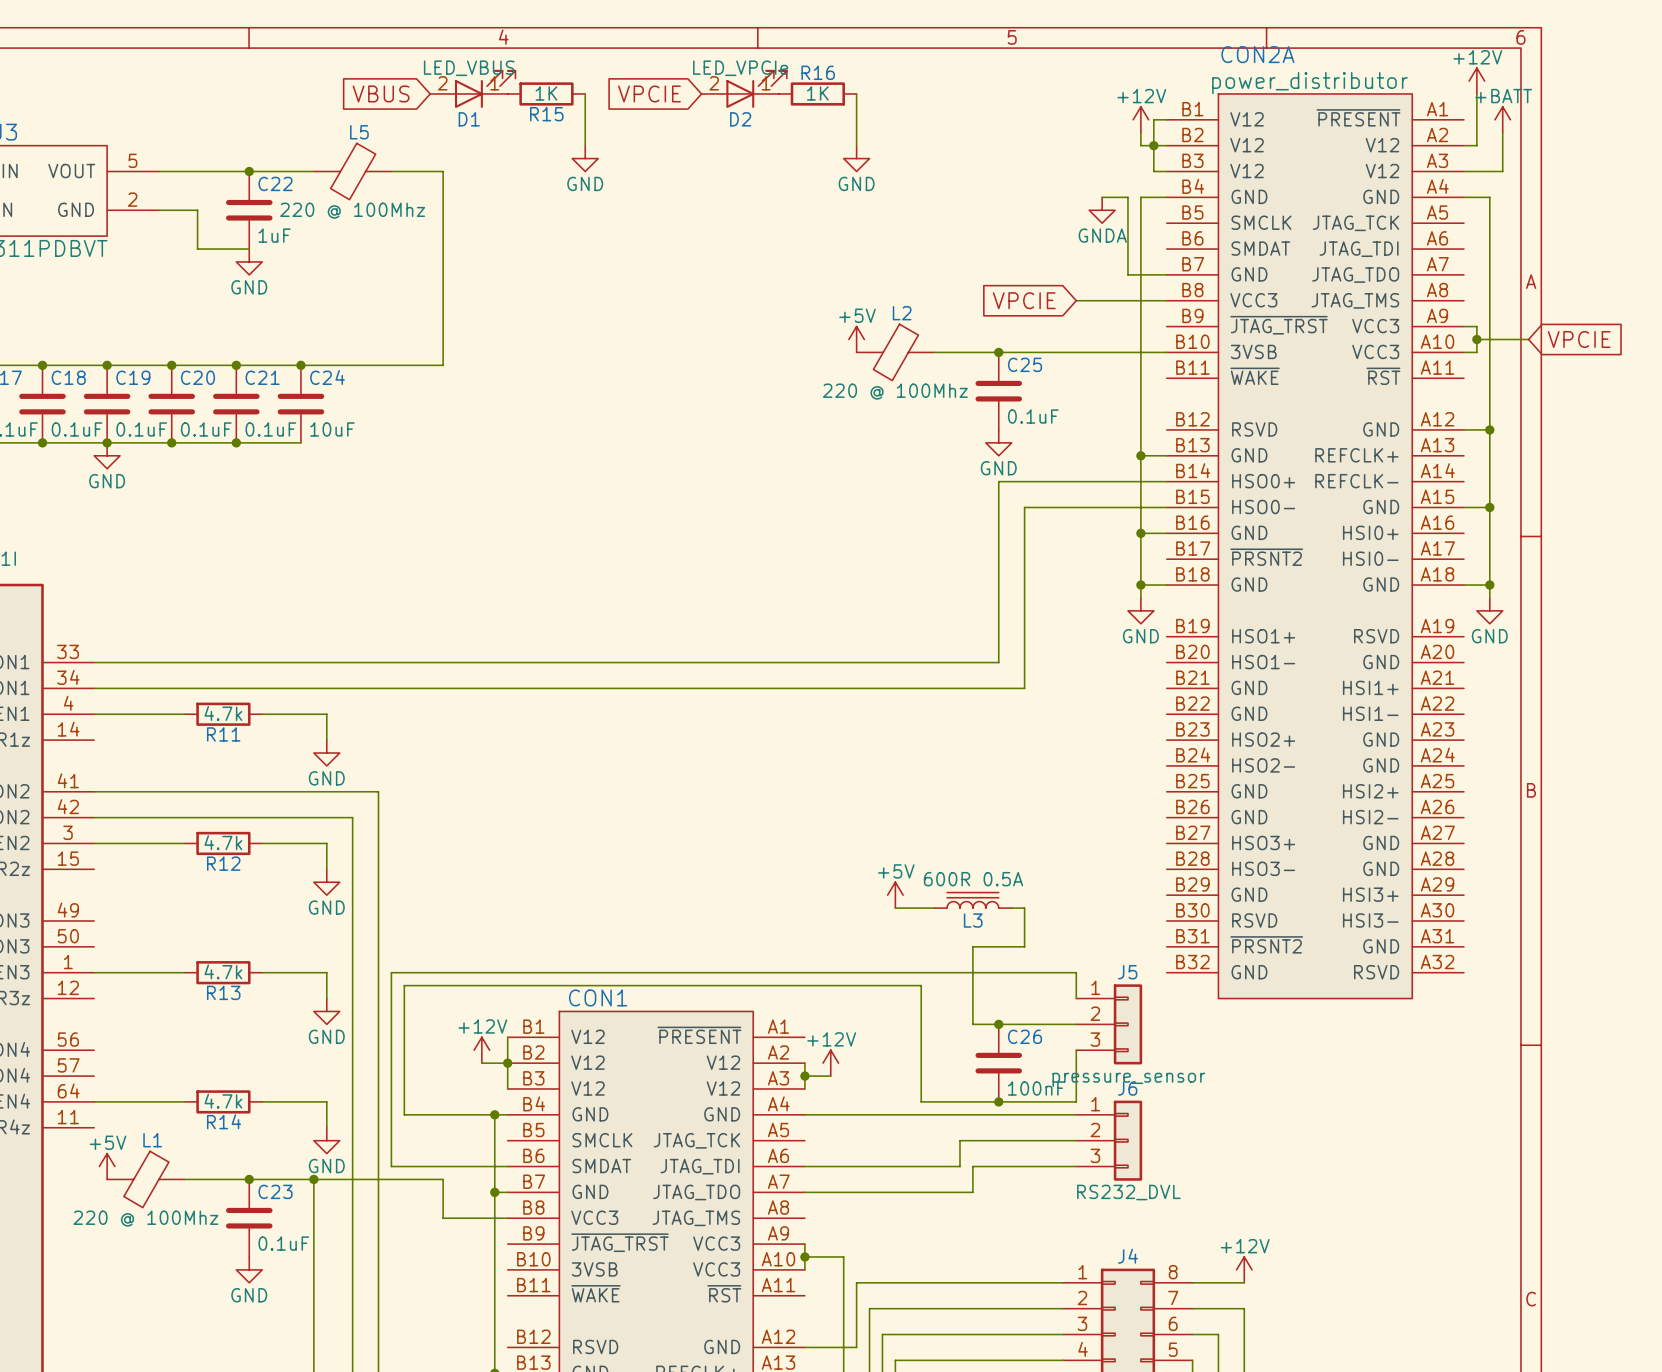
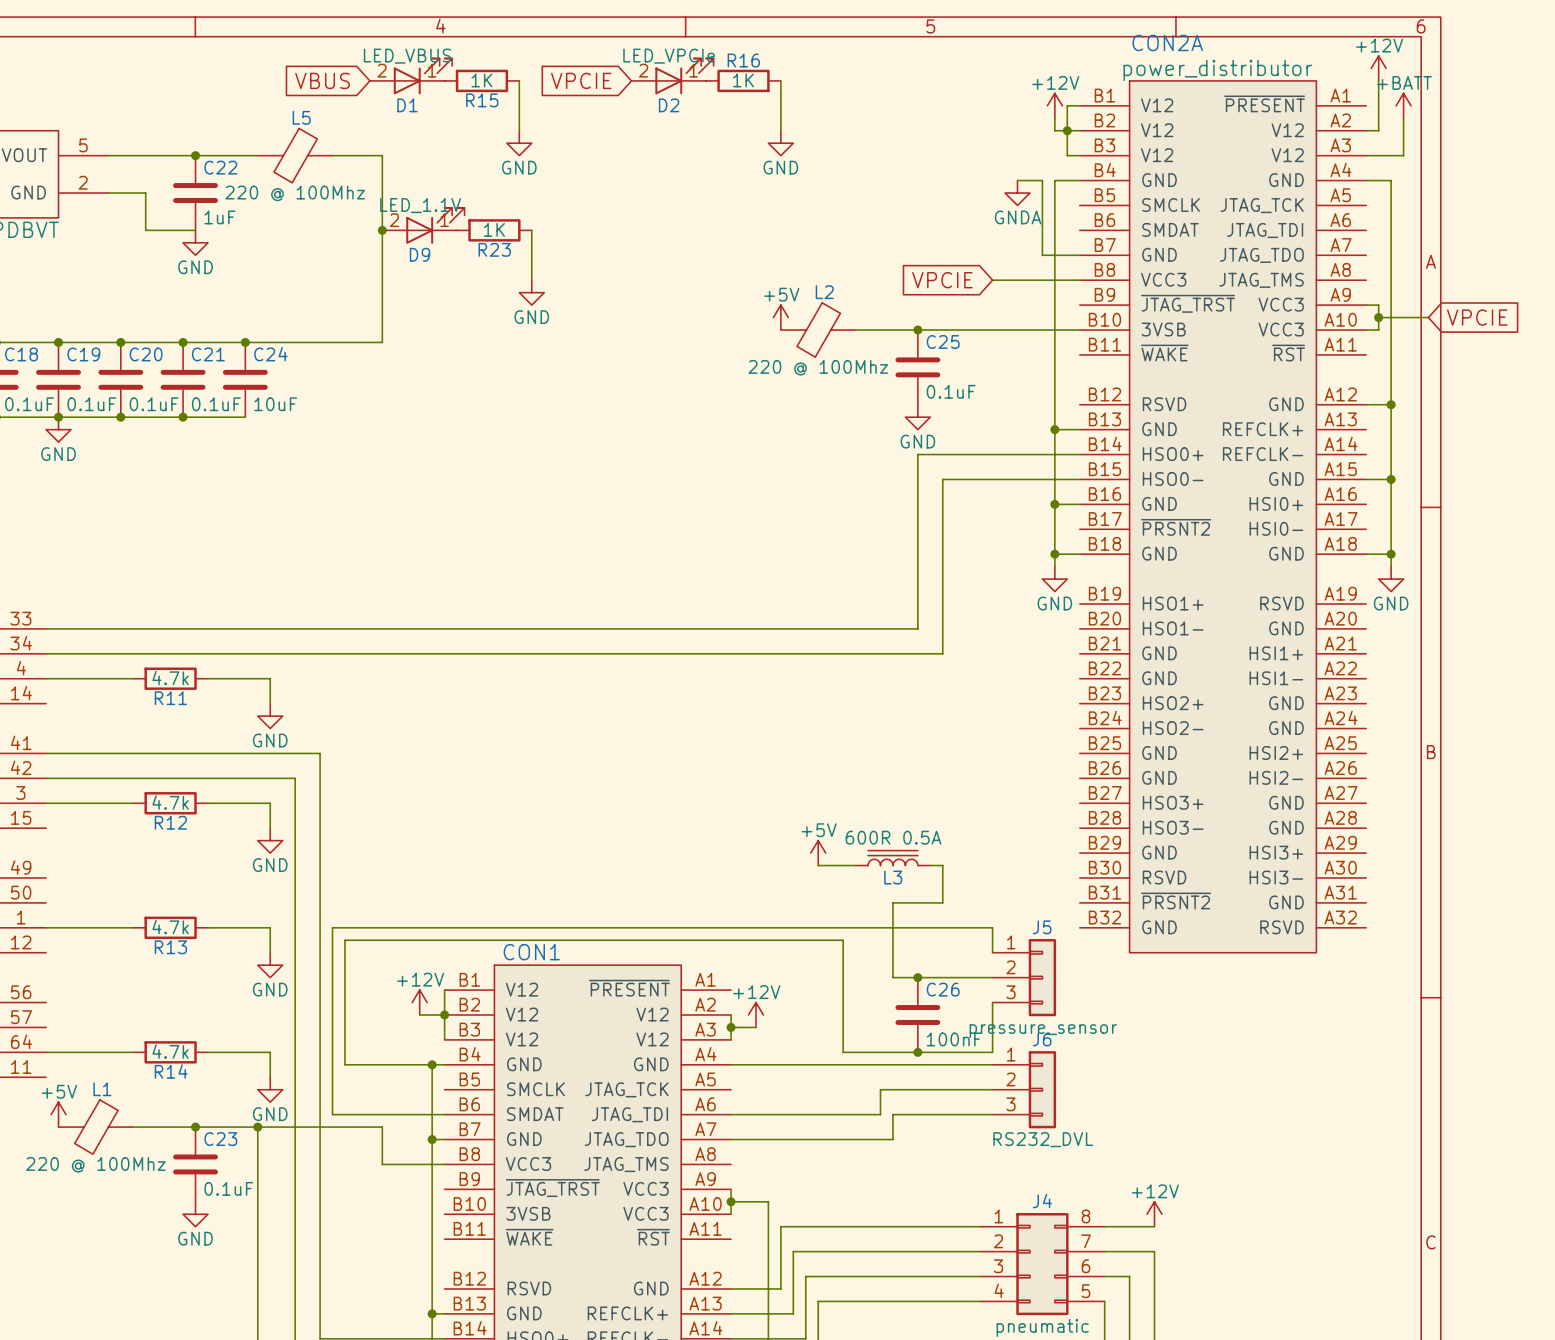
D9: none -> LED_1.1V (423, 225)
junction: none -> (382, 230)
R23: none -> 1K (494, 230)
wire: none -> (531, 230) (531, 280)
power symbol: none -> GND (531, 292)

